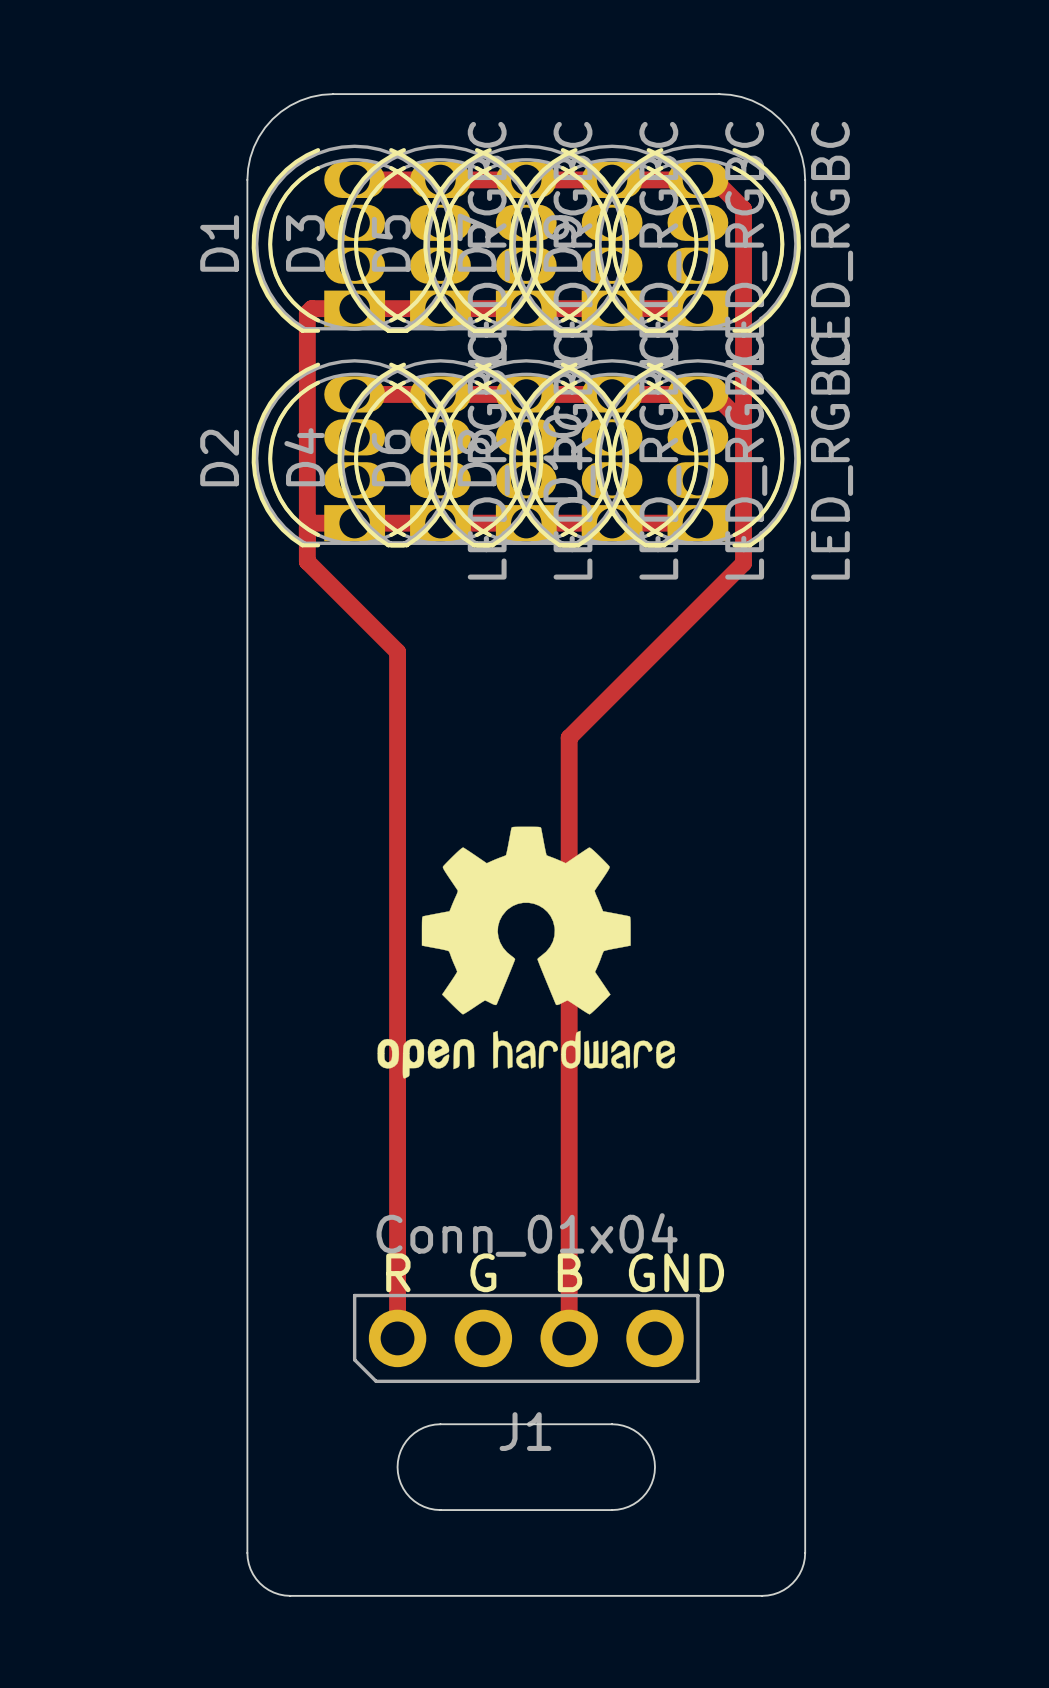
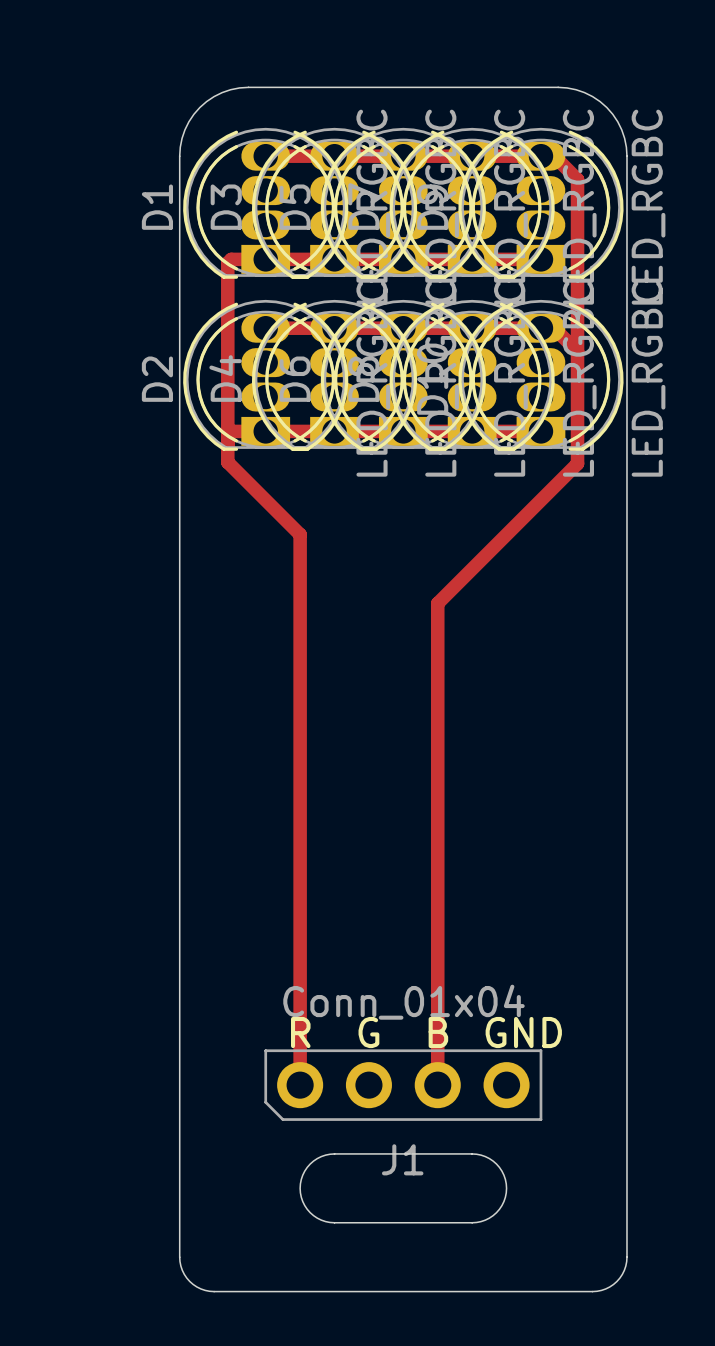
drawing: [377, 826, 675, 1079] -> none

